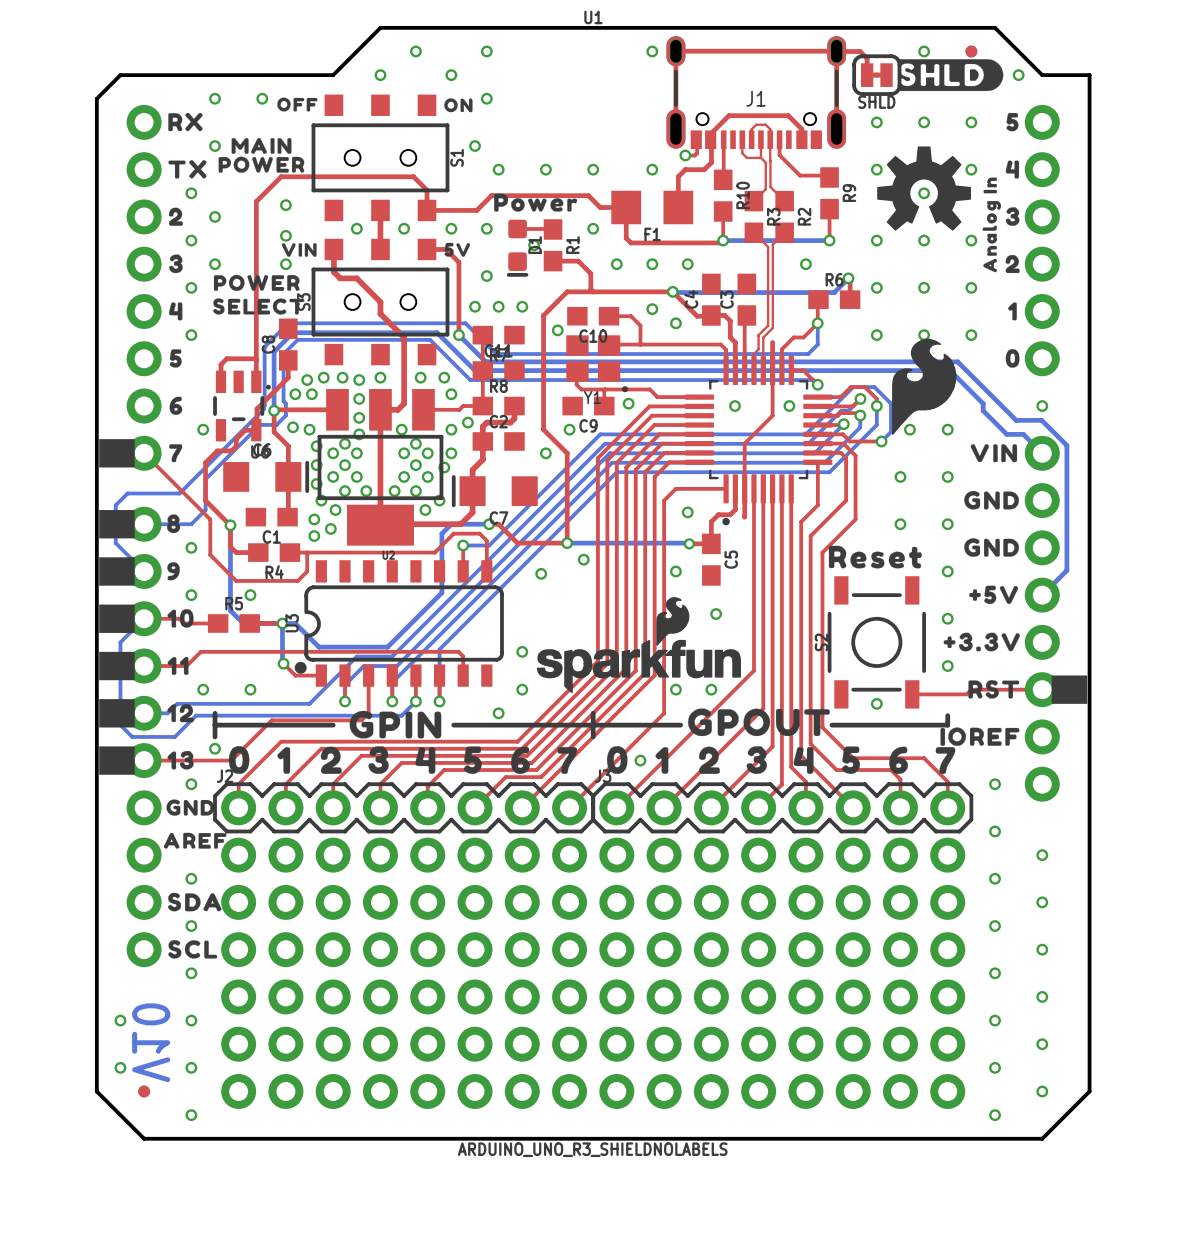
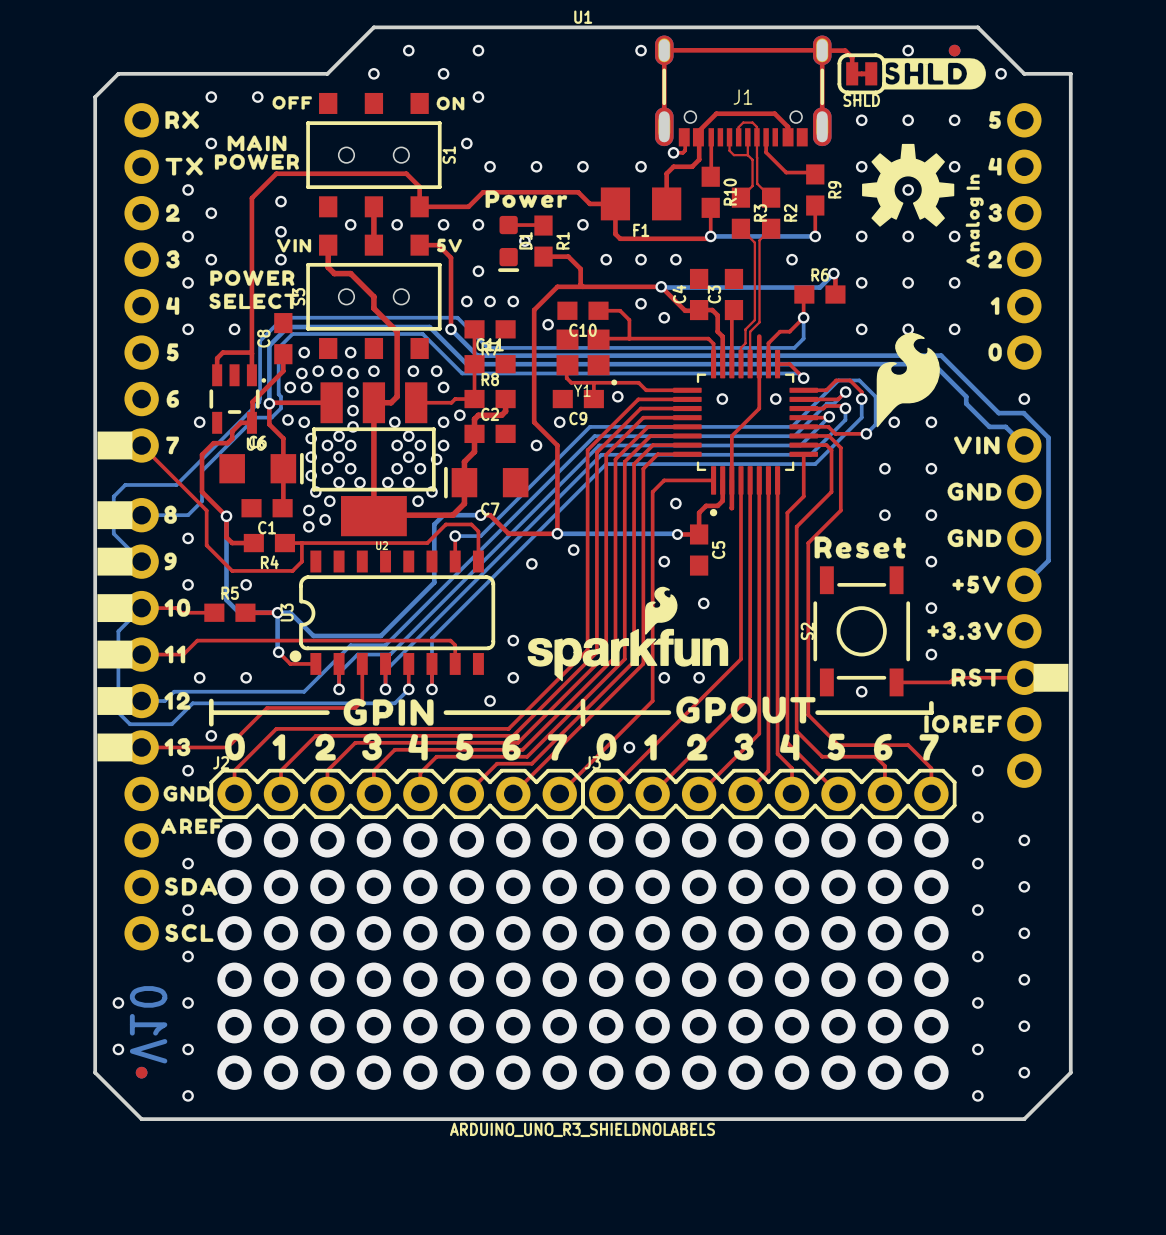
via: none -> (234, 329)
via: none -> (304, 352)
via: none -> (350, 352)

